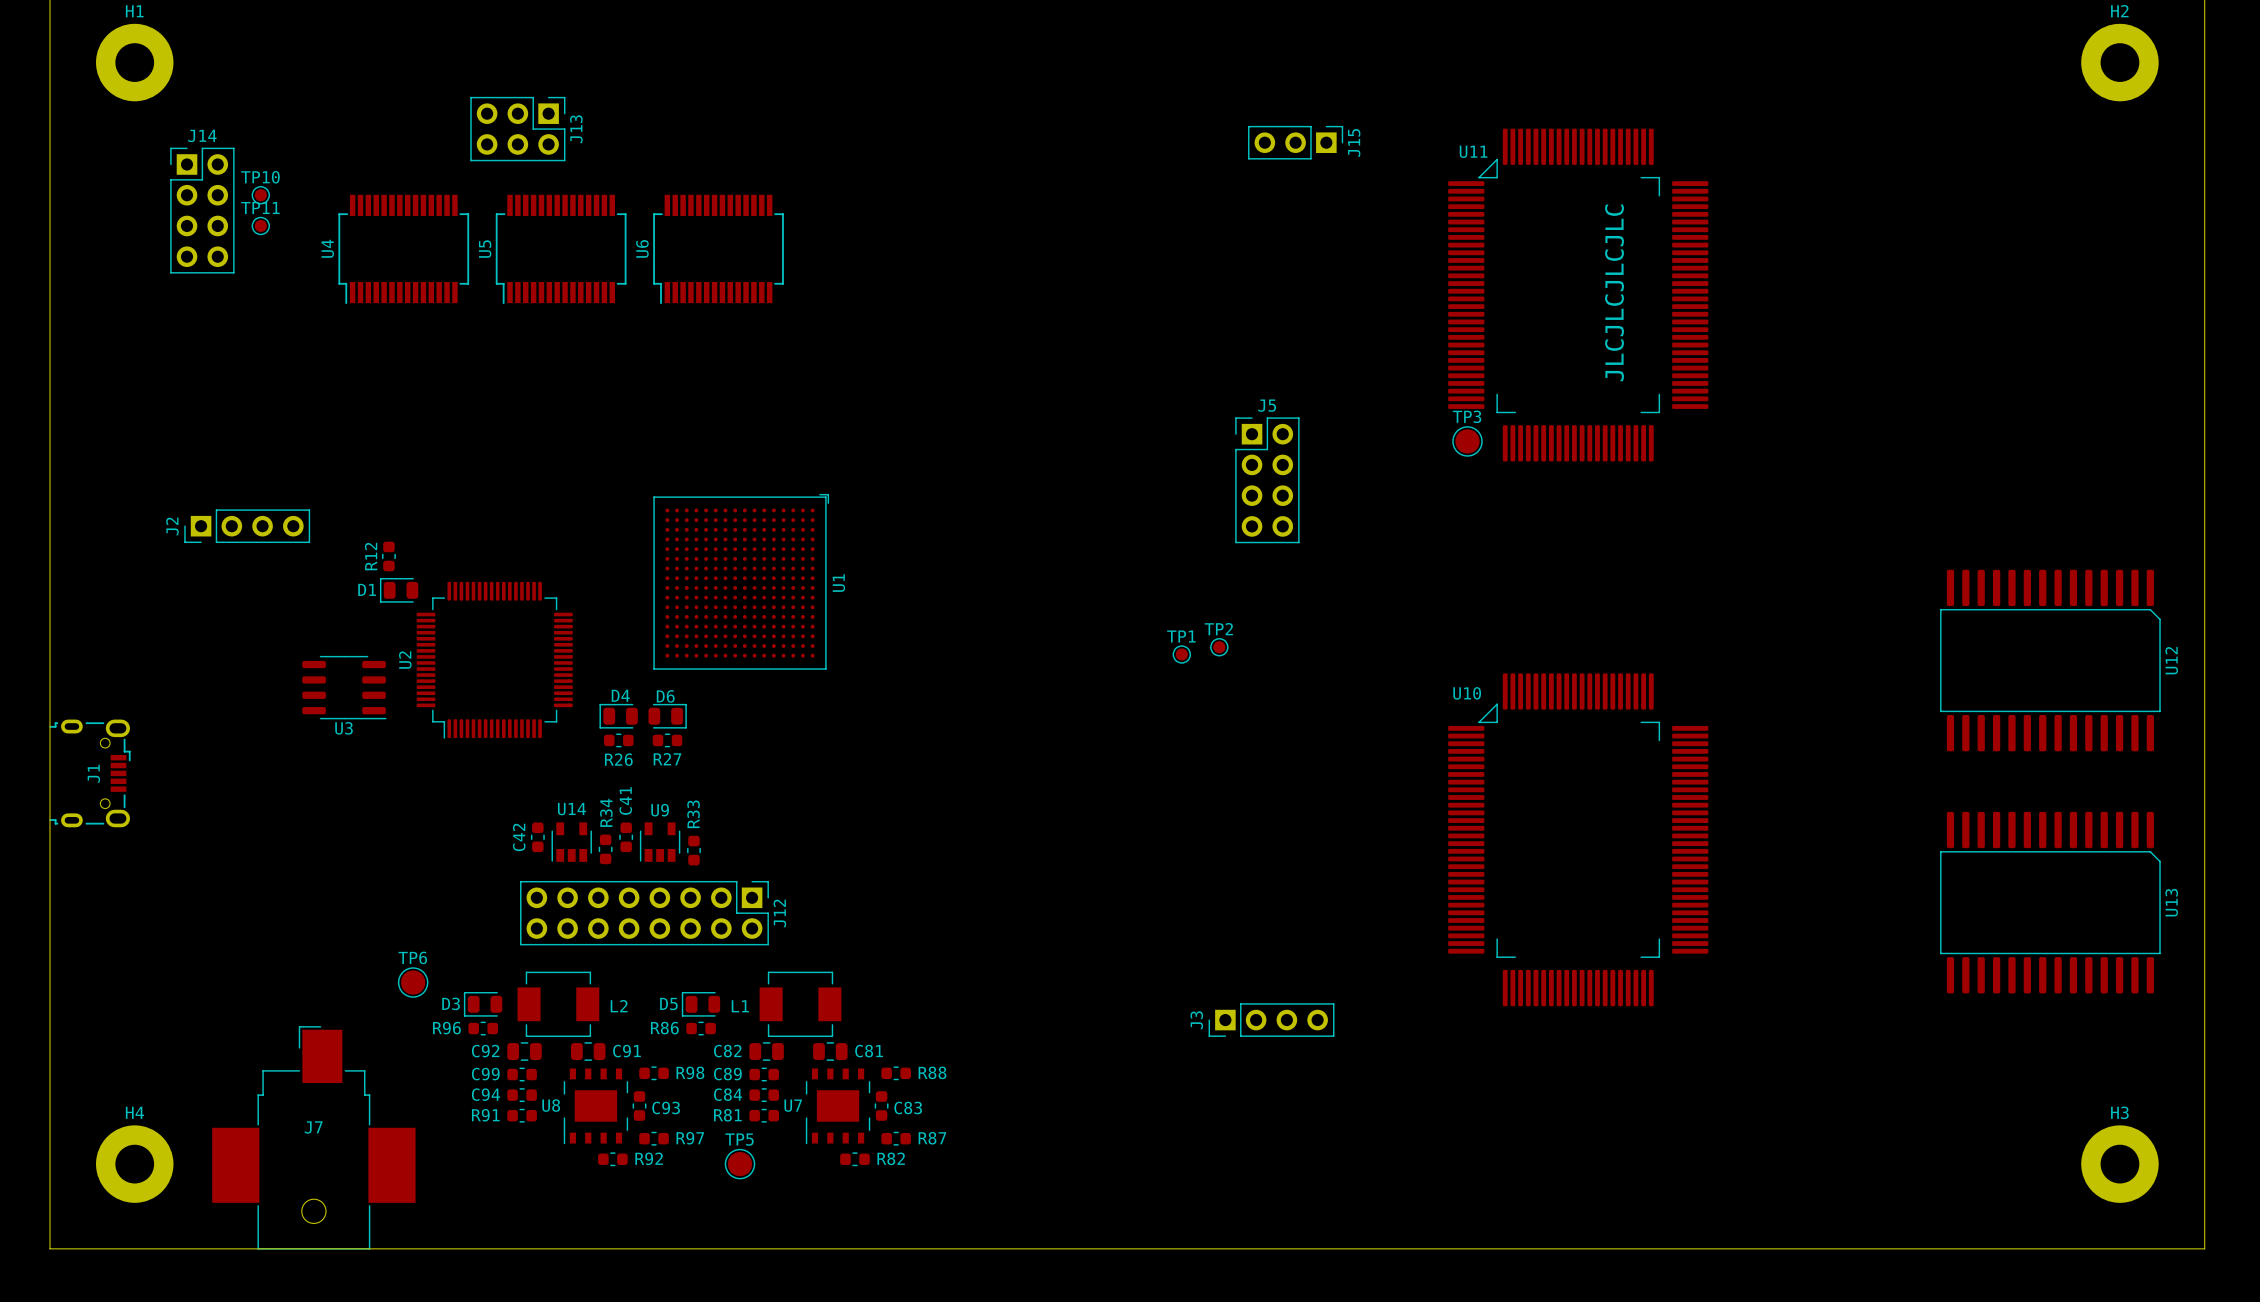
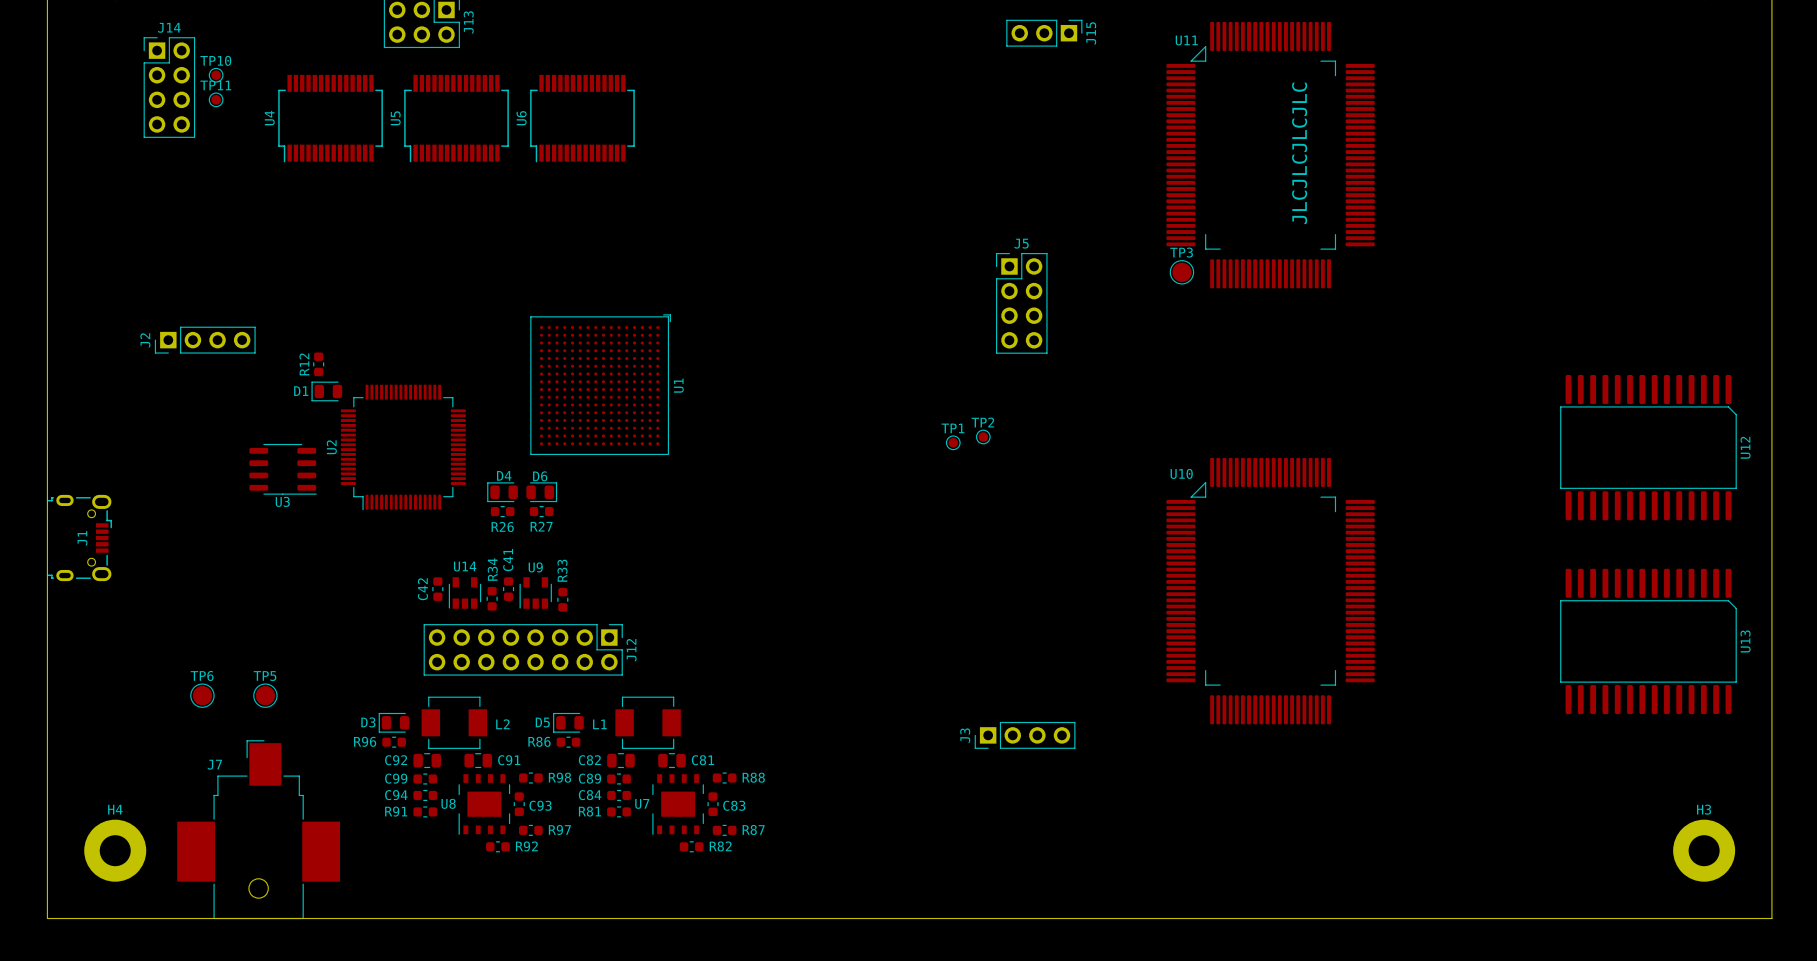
TP6 position: (413, 982) -> (202, 695)
J7 name position: J7 (313, 1127) -> J7 (214, 764)
TP5 position: (739, 1164) -> (265, 695)

